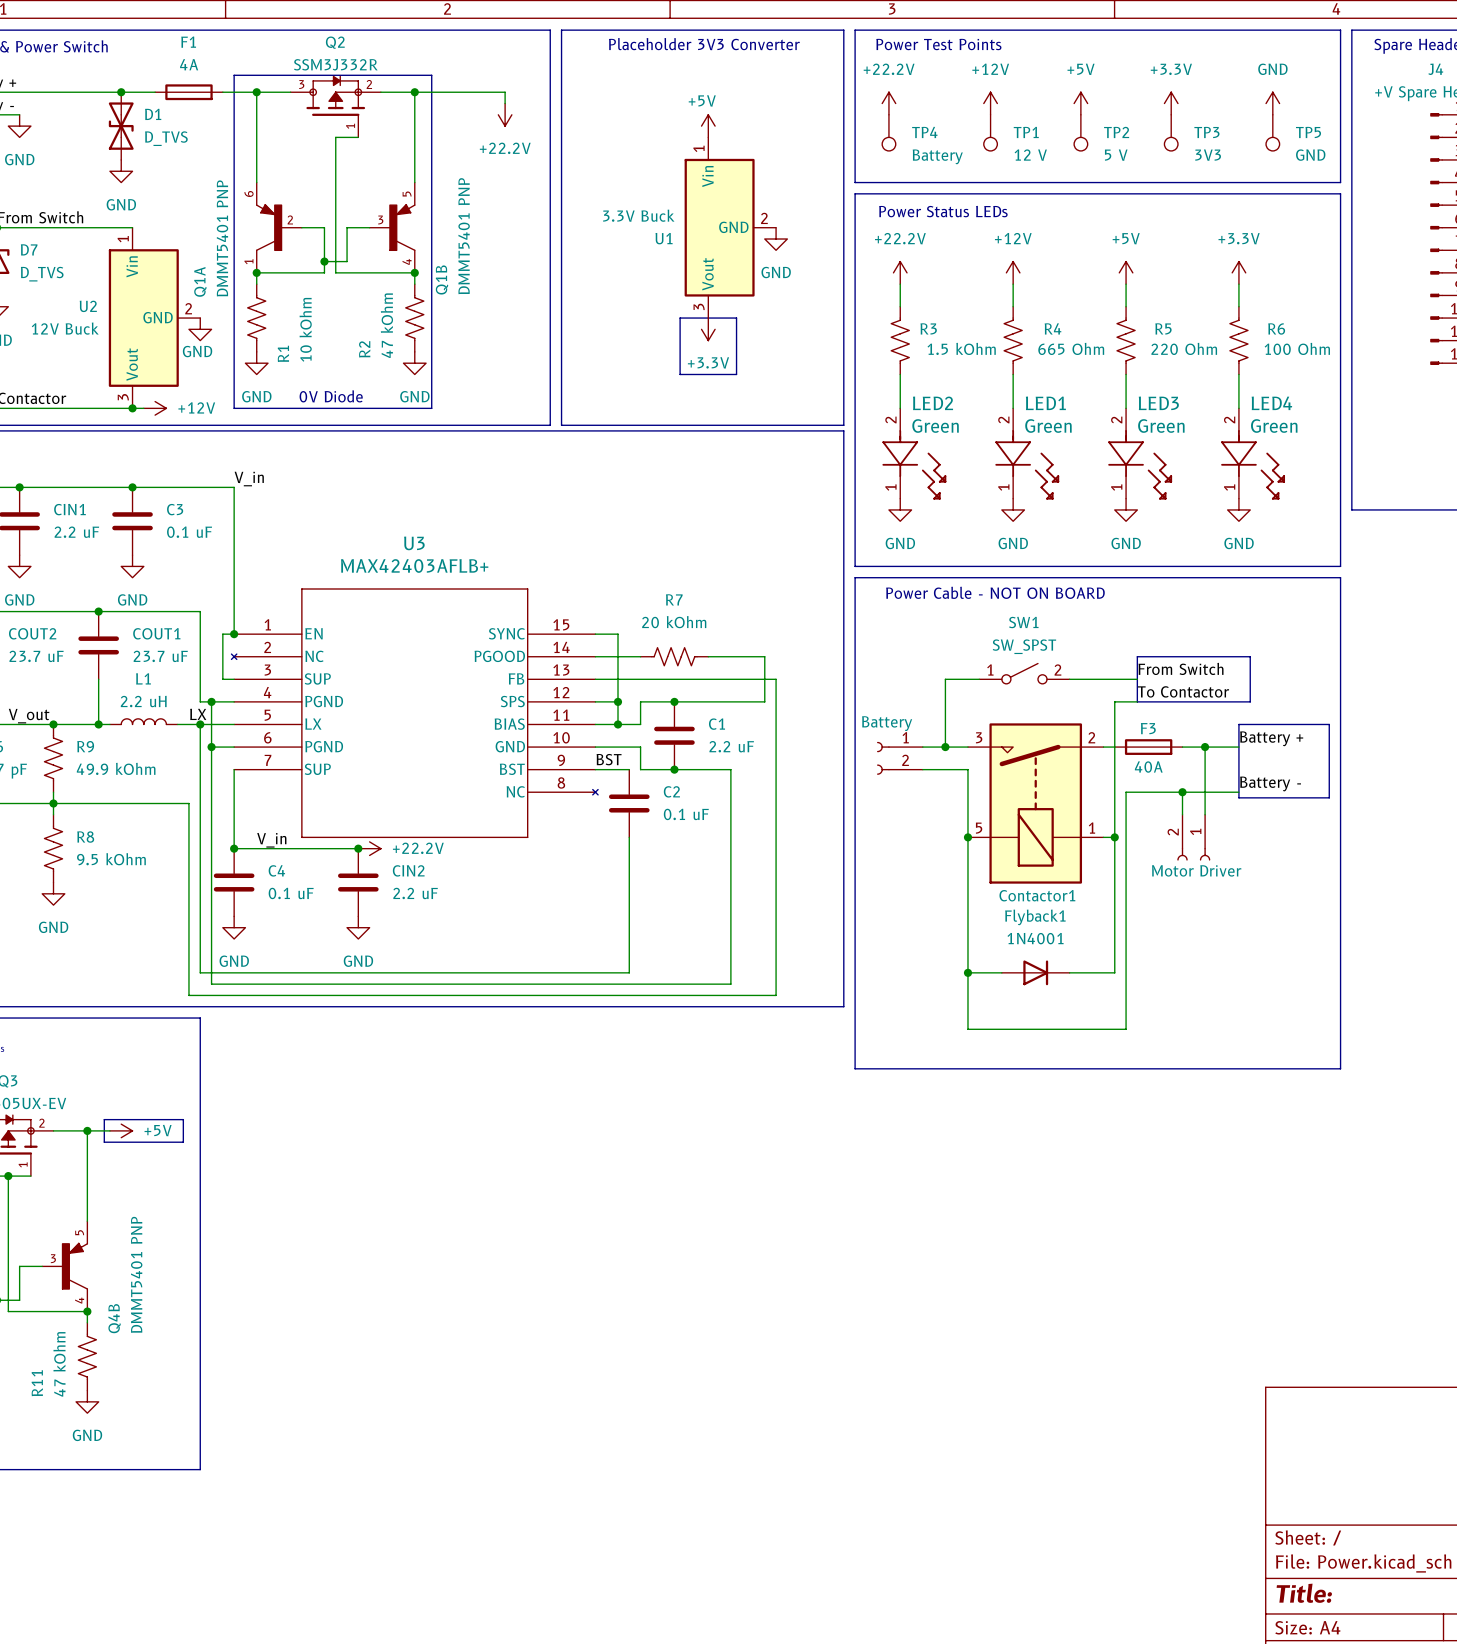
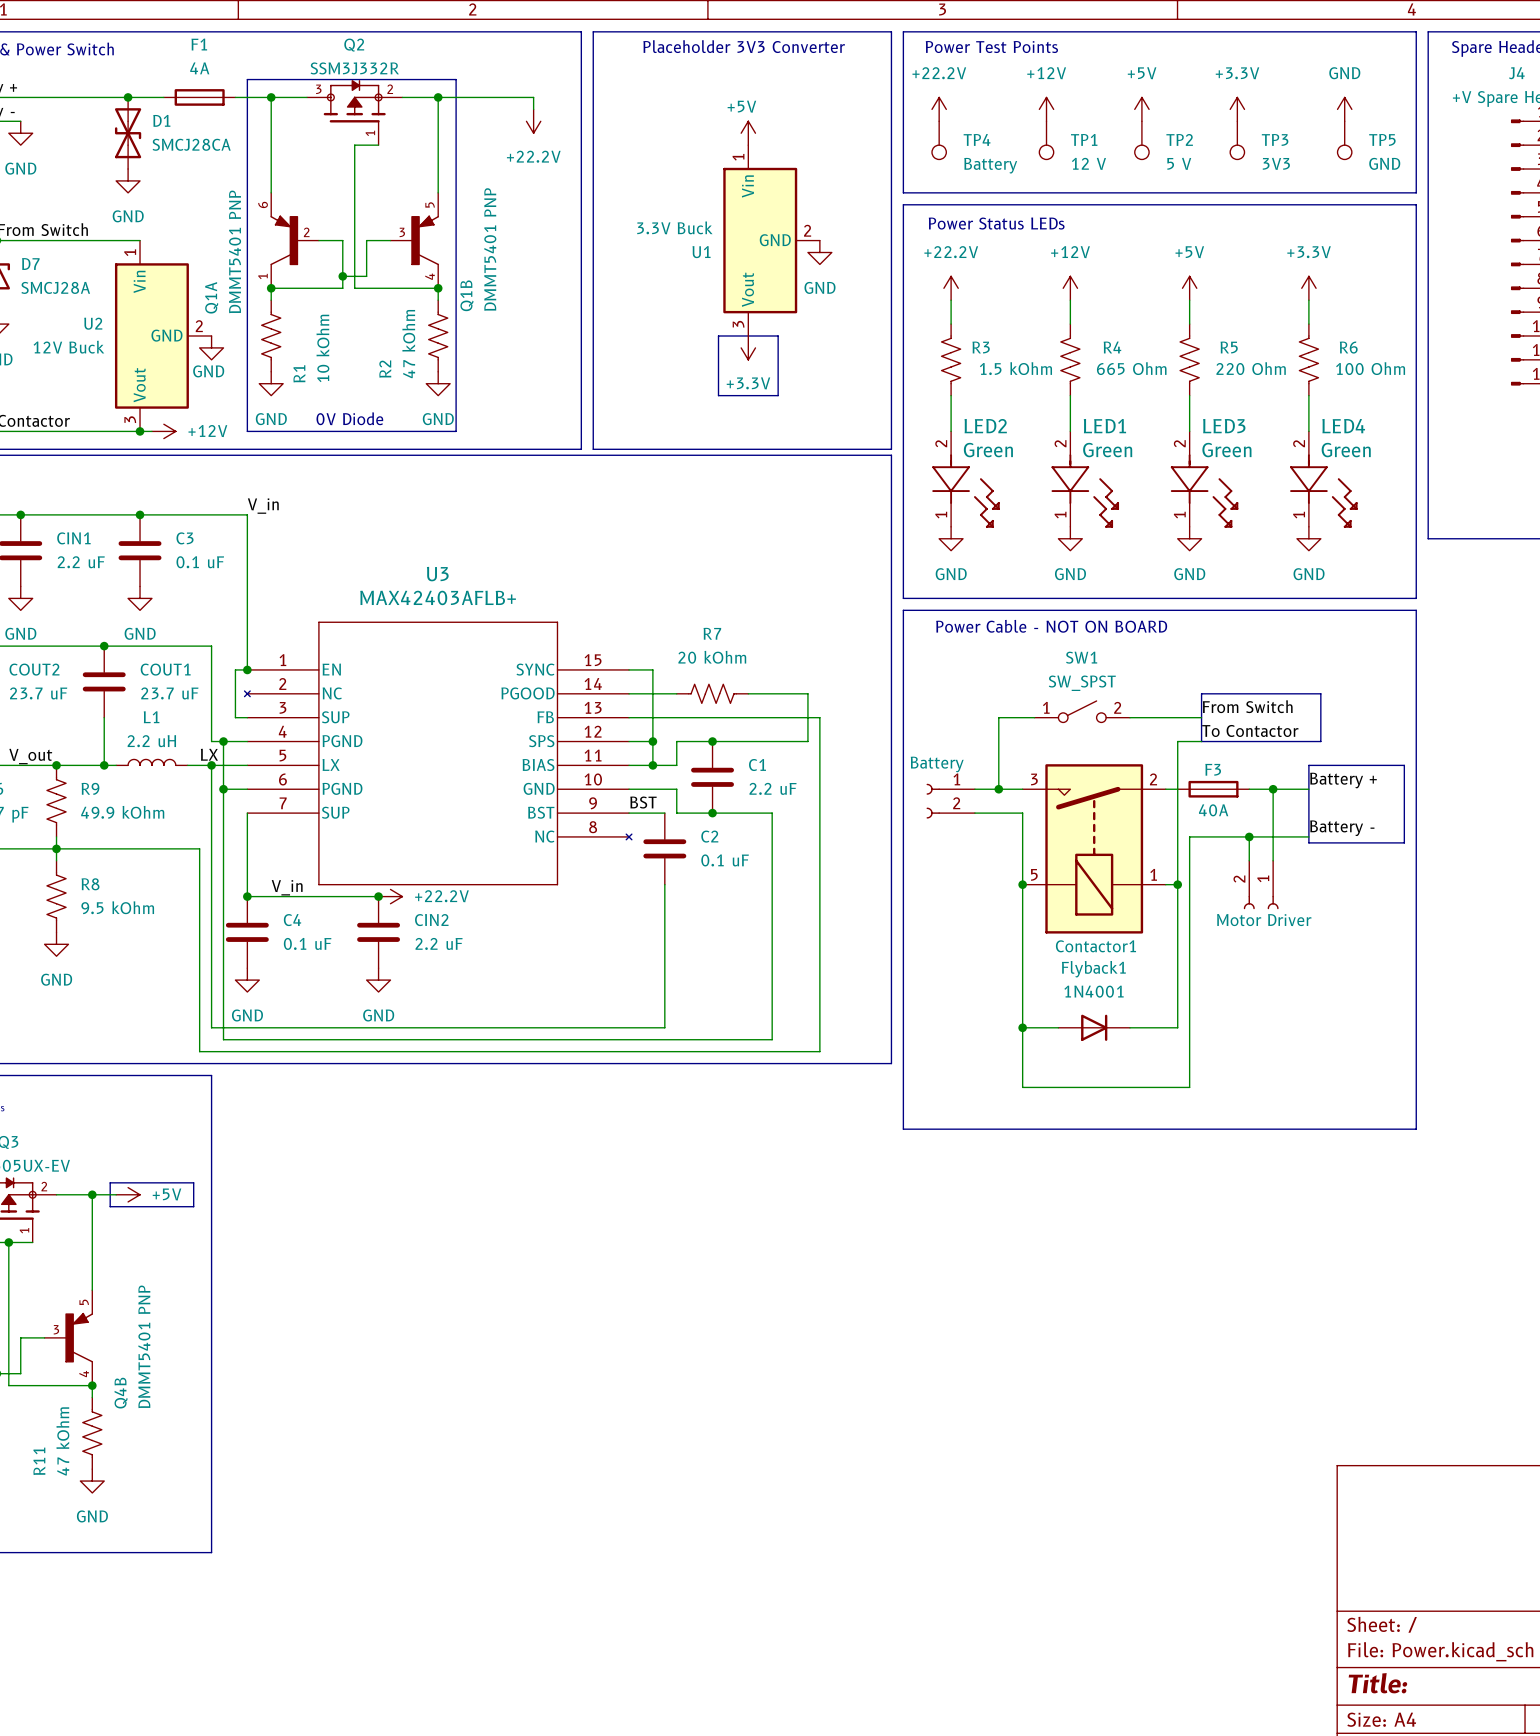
D1 value: D_TVS (166, 138) -> SMCJ28CA (191, 144)
D7 value: D_TVS (42, 274) -> SMCJ28A (55, 287)

